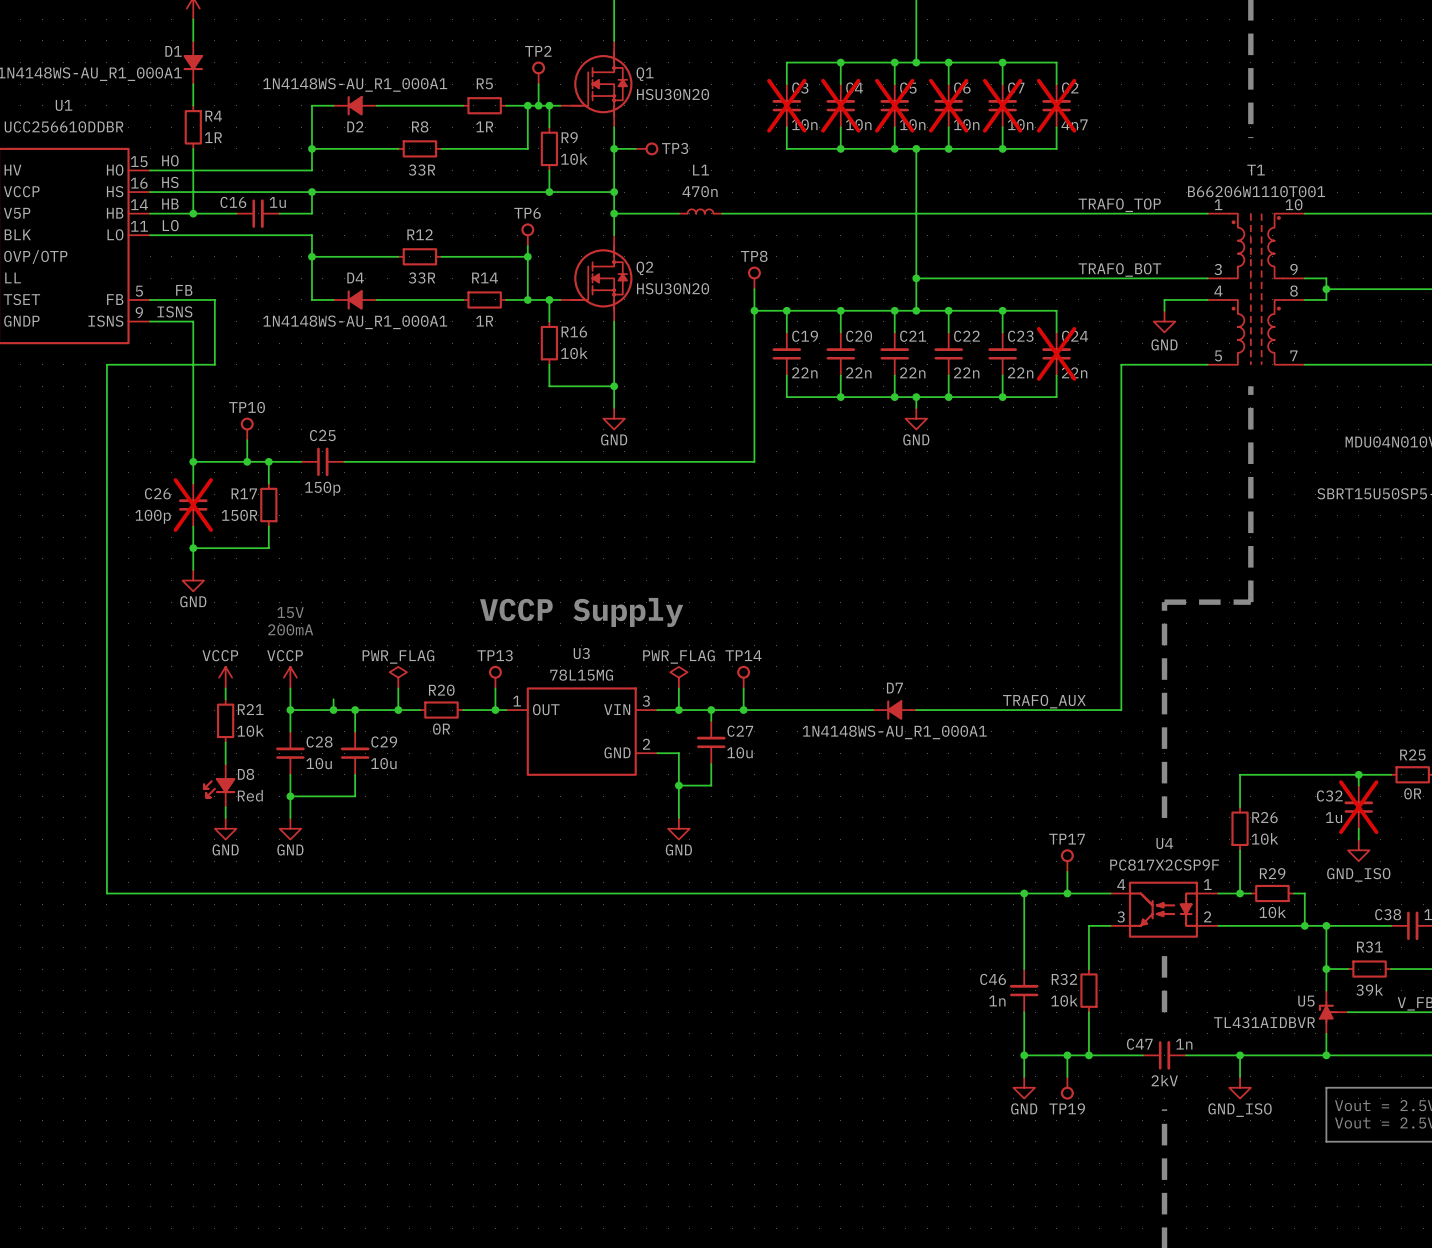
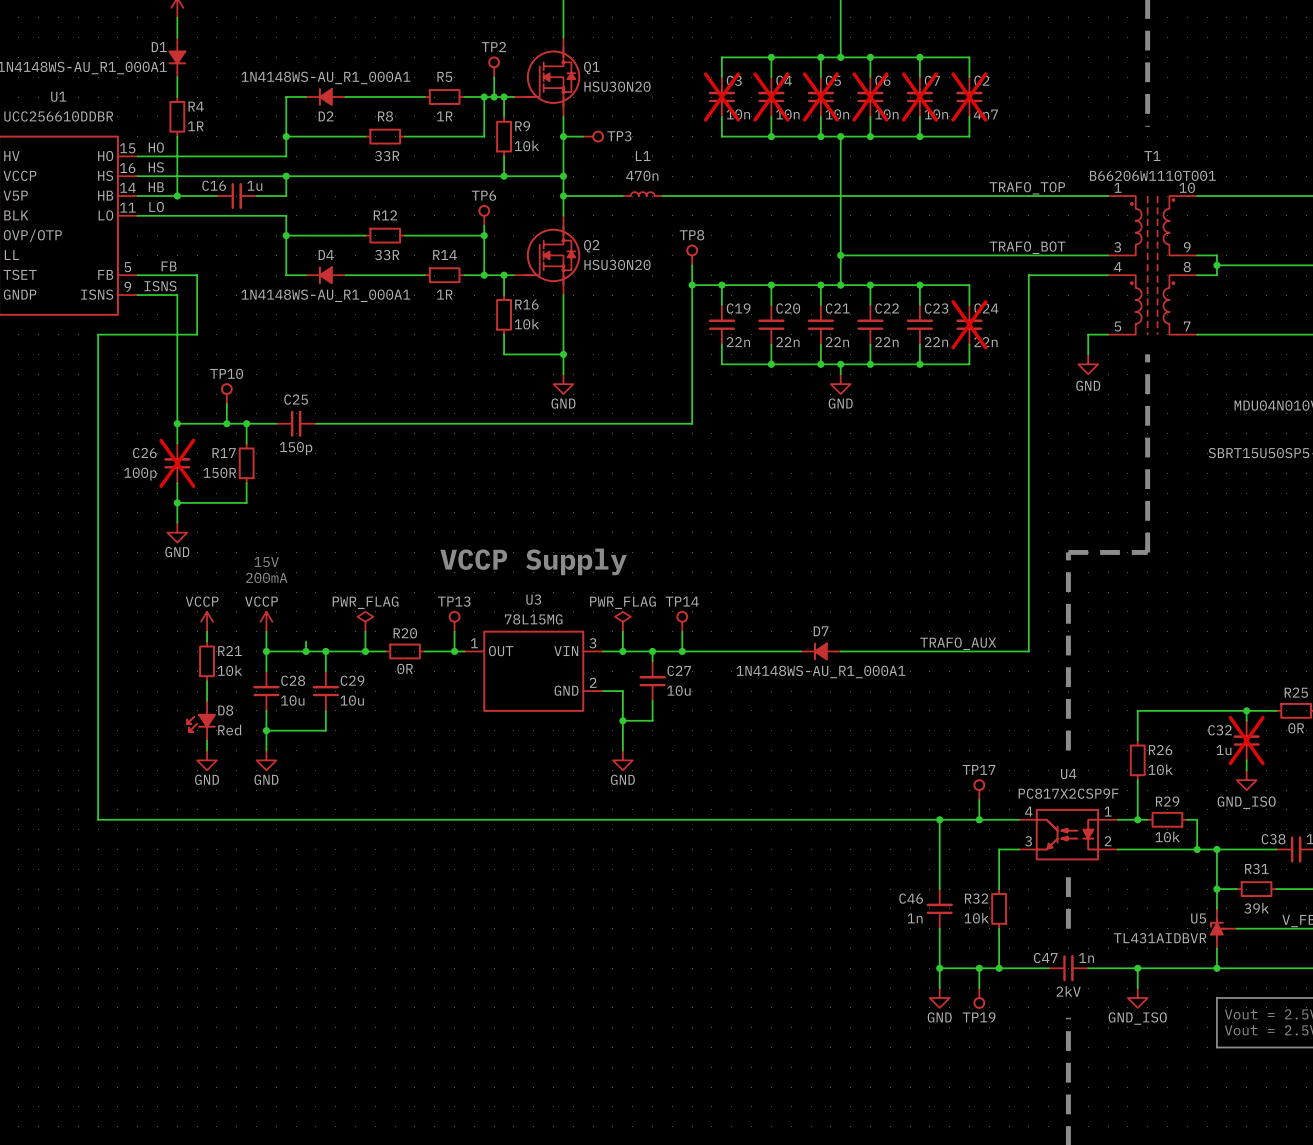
wire: (1164, 299) (1164, 310) -> none
power symbol position: GND (1164, 321) -> GND (1088, 364)
wire: (1121, 364) (1186, 364) -> (1028, 334) (1028, 275) (1068, 275)
wire: none -> (1088, 334) (1088, 354)

